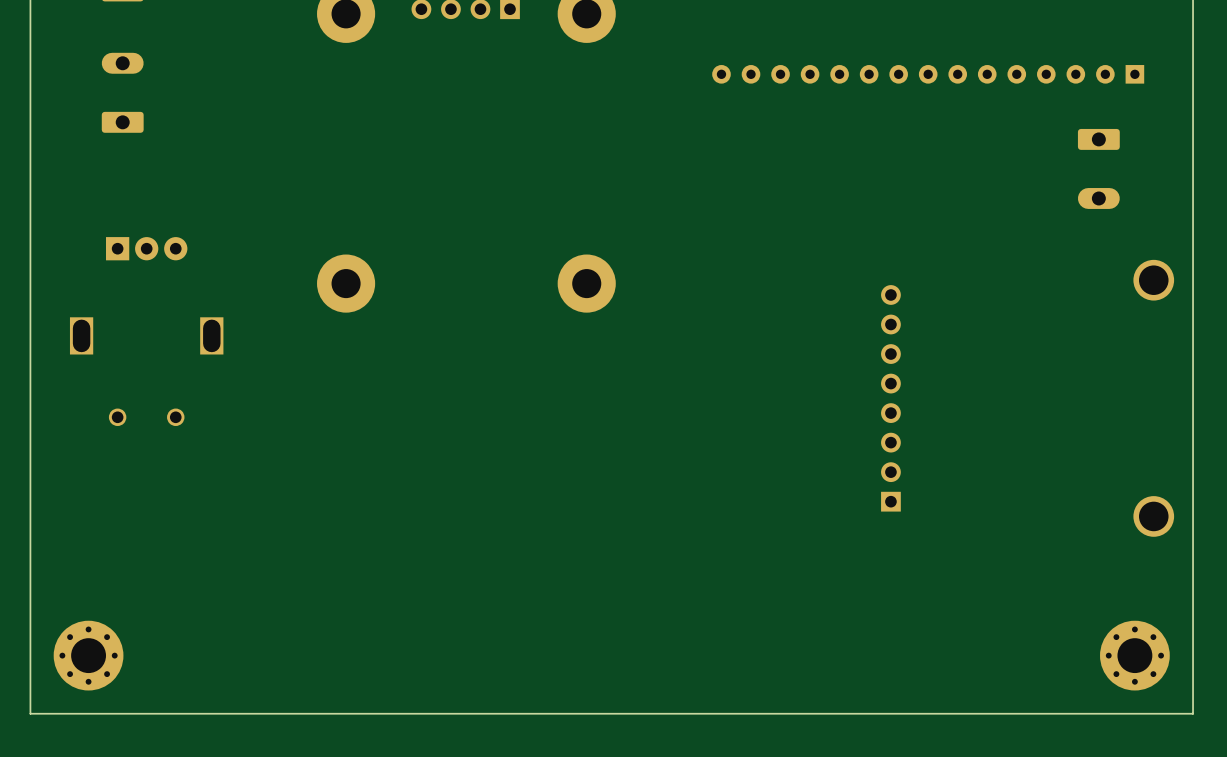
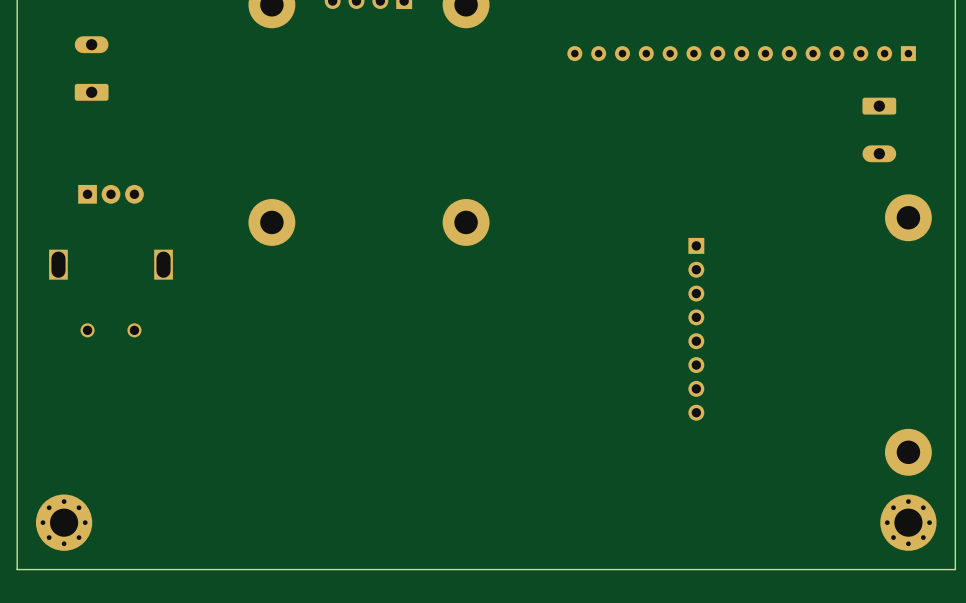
part: none -> (908, 217)
part: (1153, 280) -> none
part rotation: 0° (890, 398) -> 180° (696, 329)
part: (1153, 516) -> none
part: none -> (908, 452)

